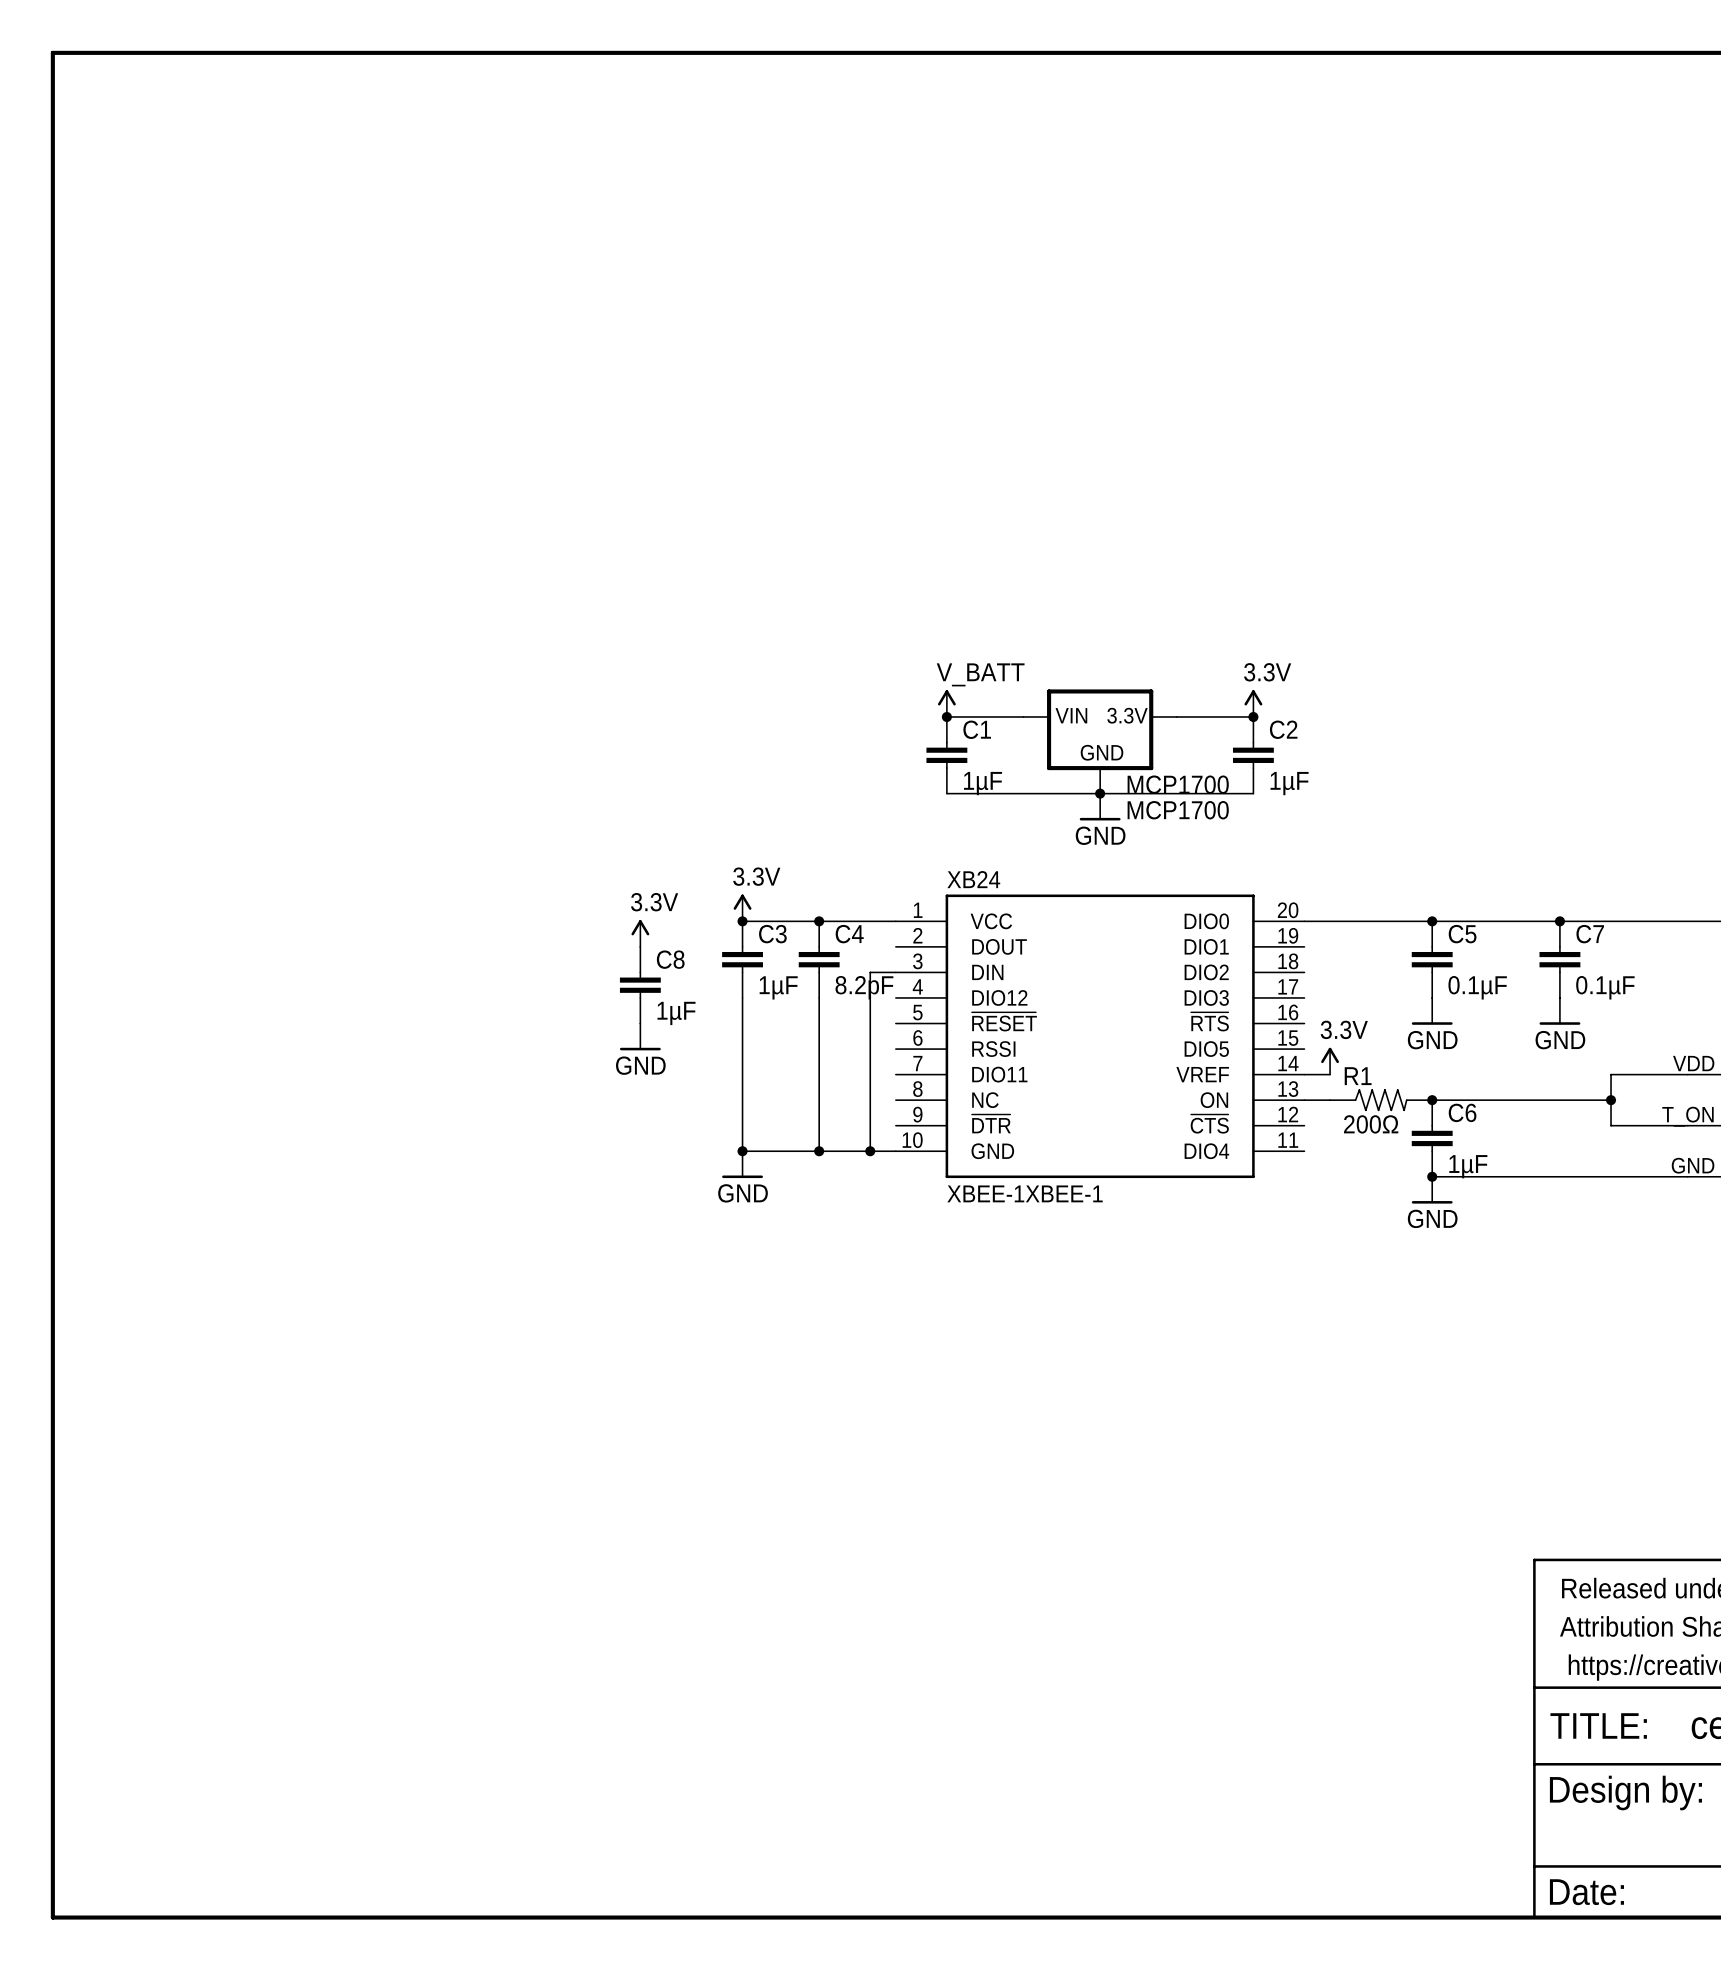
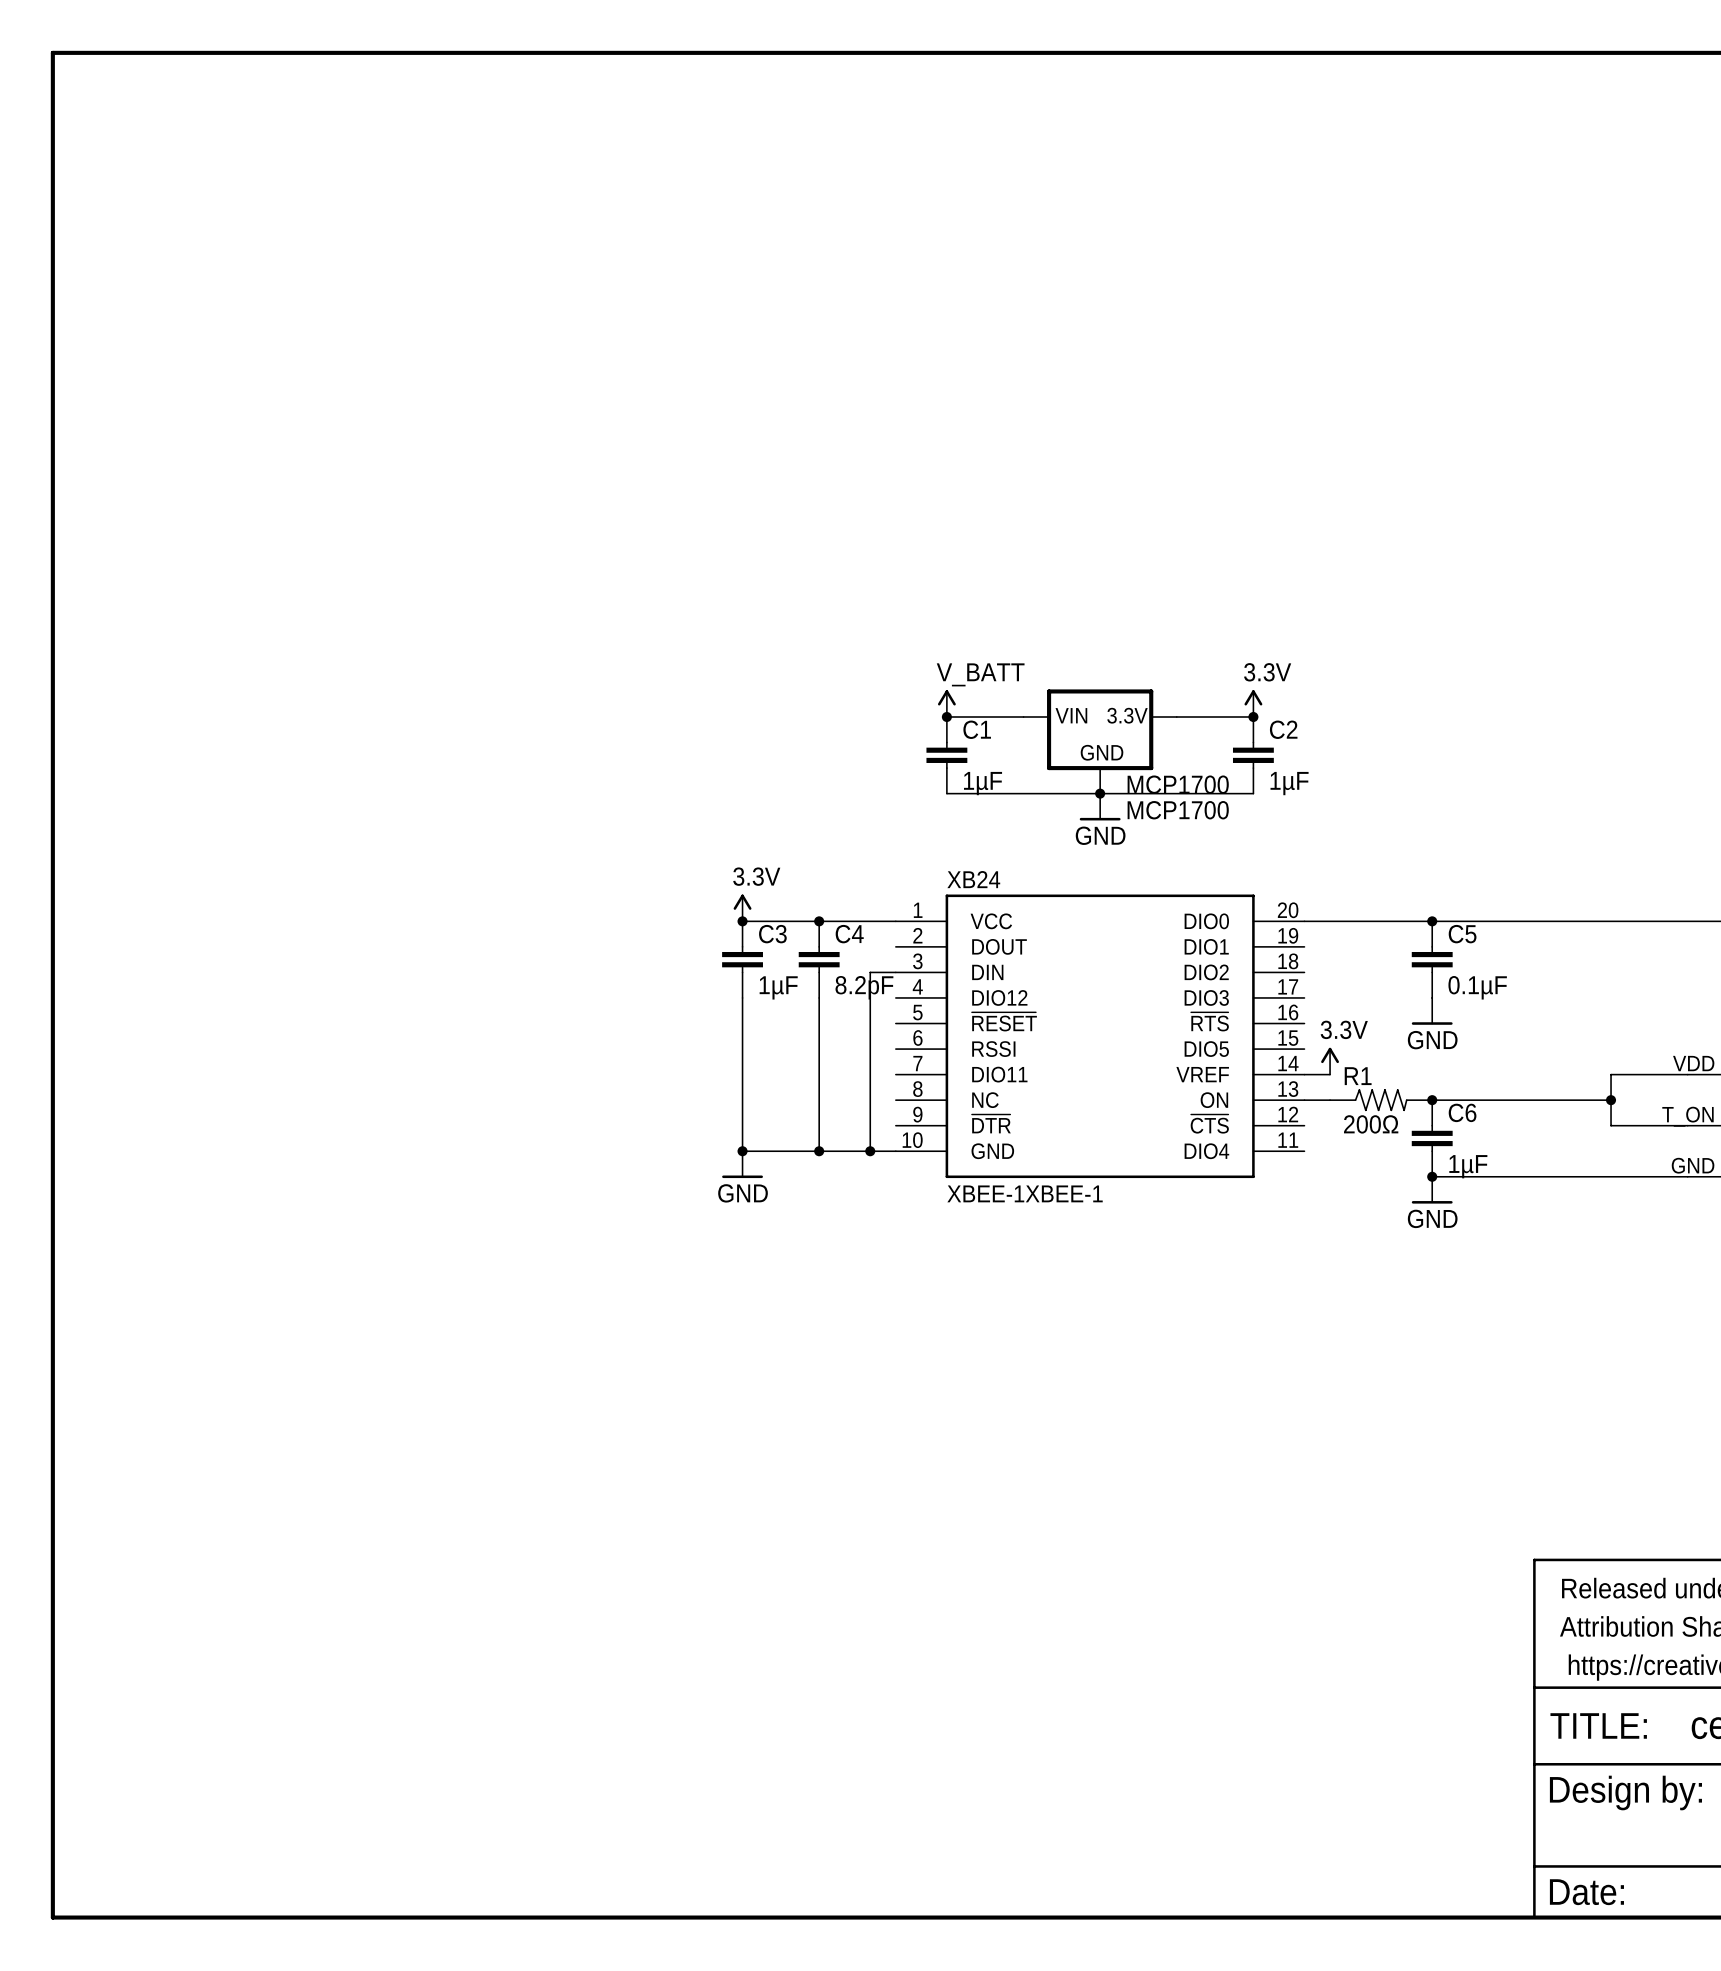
junction: (1559, 921) -> none
power symbol: 3.3V (640, 933) -> none
C7: 0.1µF (1559, 959) -> none
C8: 1µF (640, 985) -> none
power symbol: GND (1559, 1011) -> none
power symbol: GND (640, 1036) -> none

